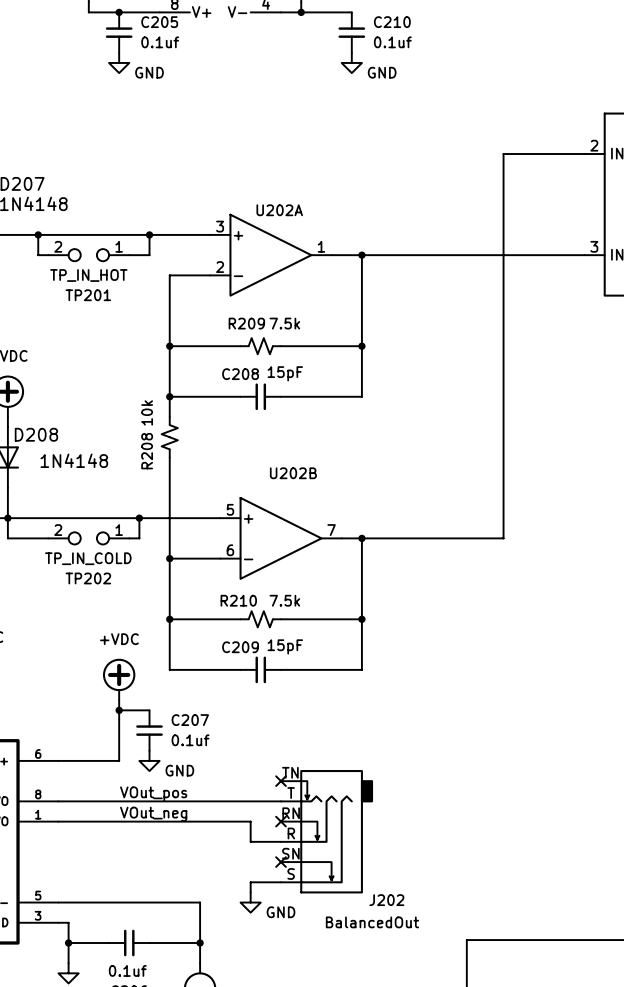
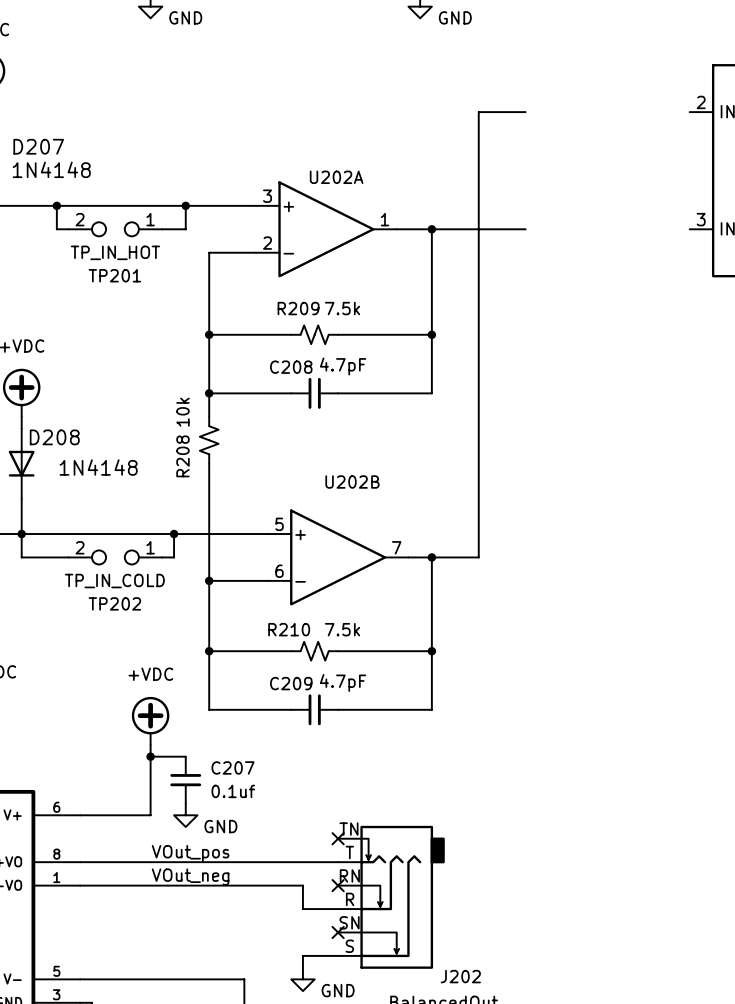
wire: (584, 154) (503, 154) (503, 538) (402, 538) -> (525, 112) (478, 112) (478, 557)
wire: (442, 255) (584, 255) -> none
C208 value: 15pF (285, 373) -> 4.7pF (343, 366)
C209 value: 15pF (285, 646) -> 4.7pF (343, 682)

